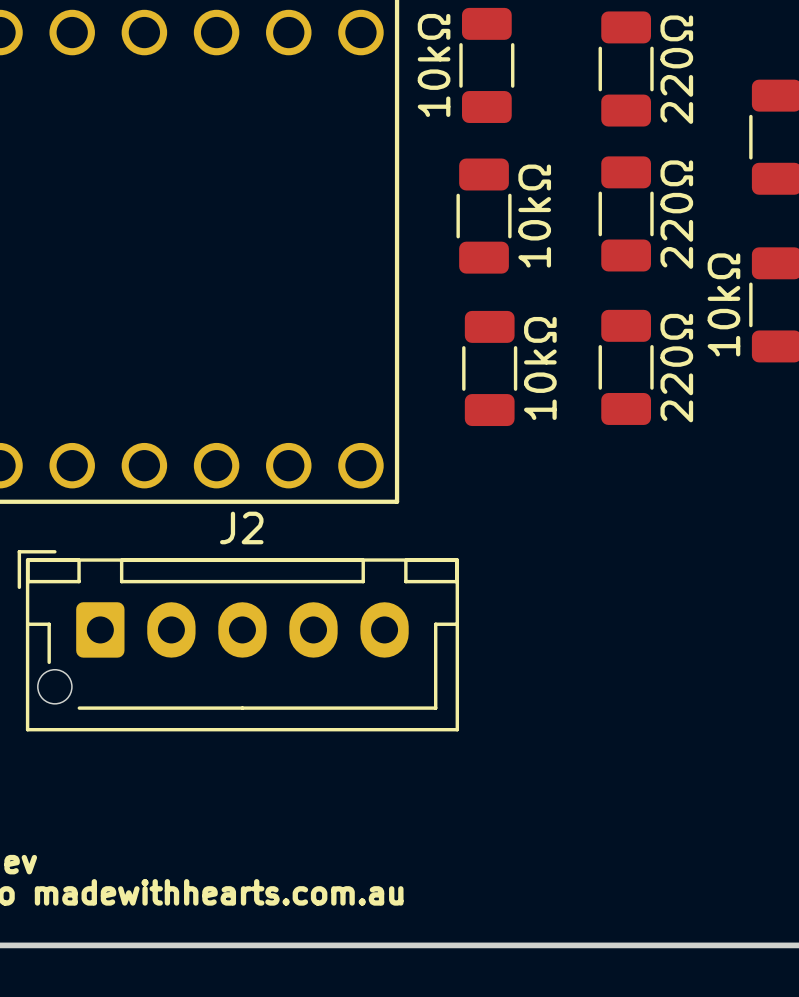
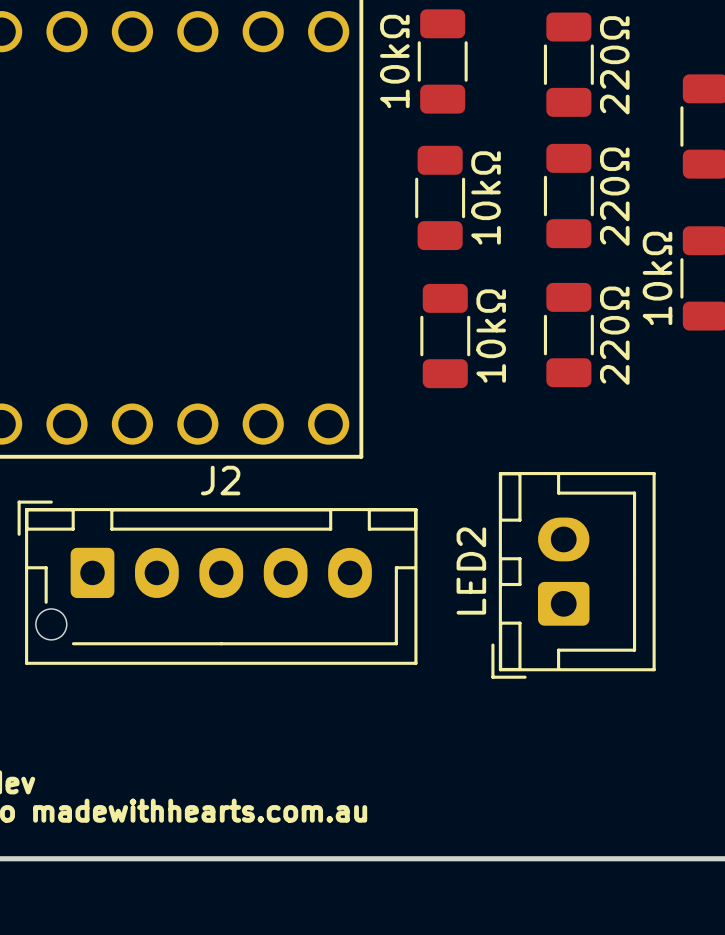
LED2: none -> (573, 575)

